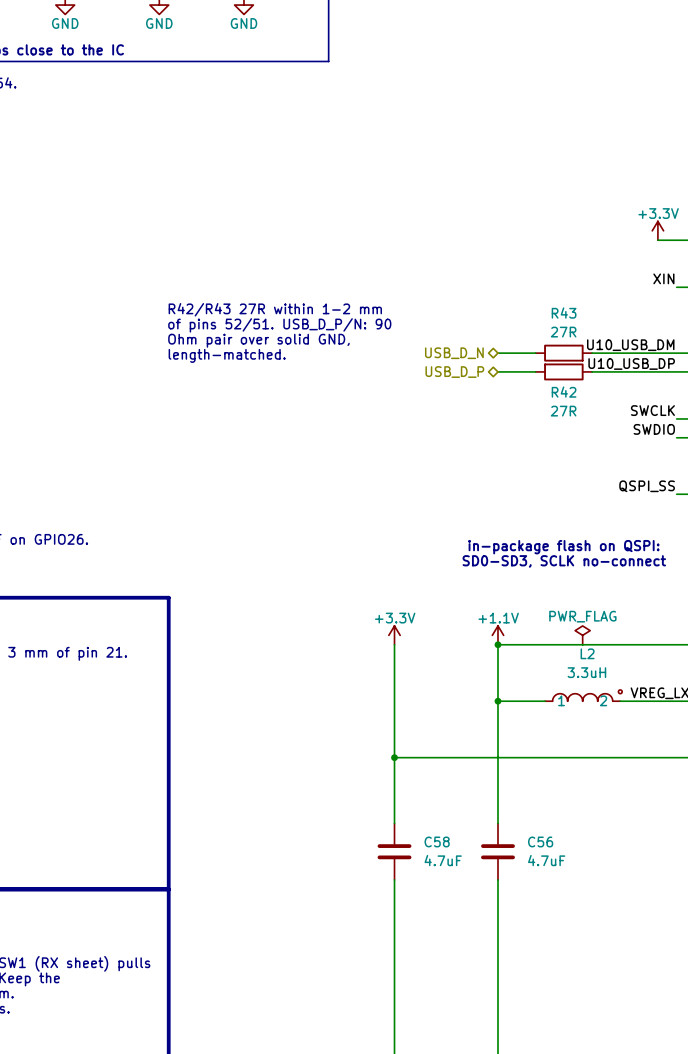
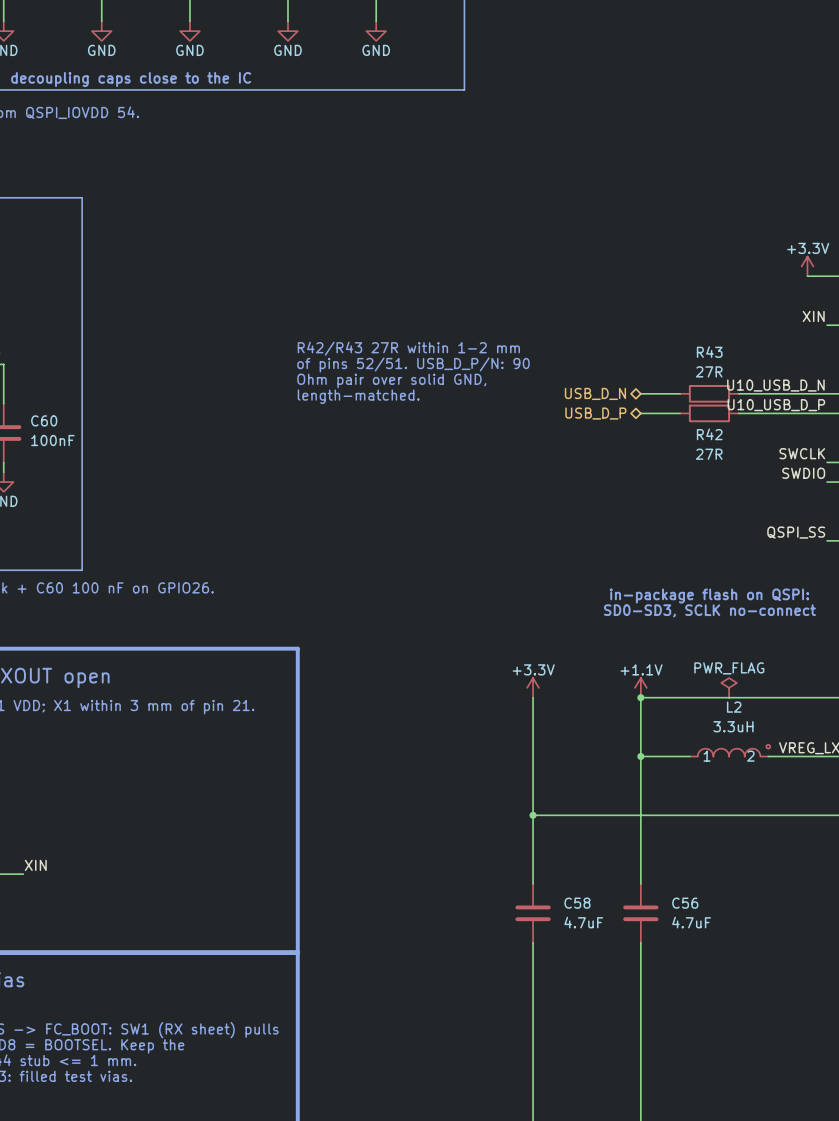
label: U10_USB_DM (630, 345) -> U10_USB_D_N (775, 385)
label: U10_USB_DP (631, 363) -> U10_USB_D_P (776, 405)

